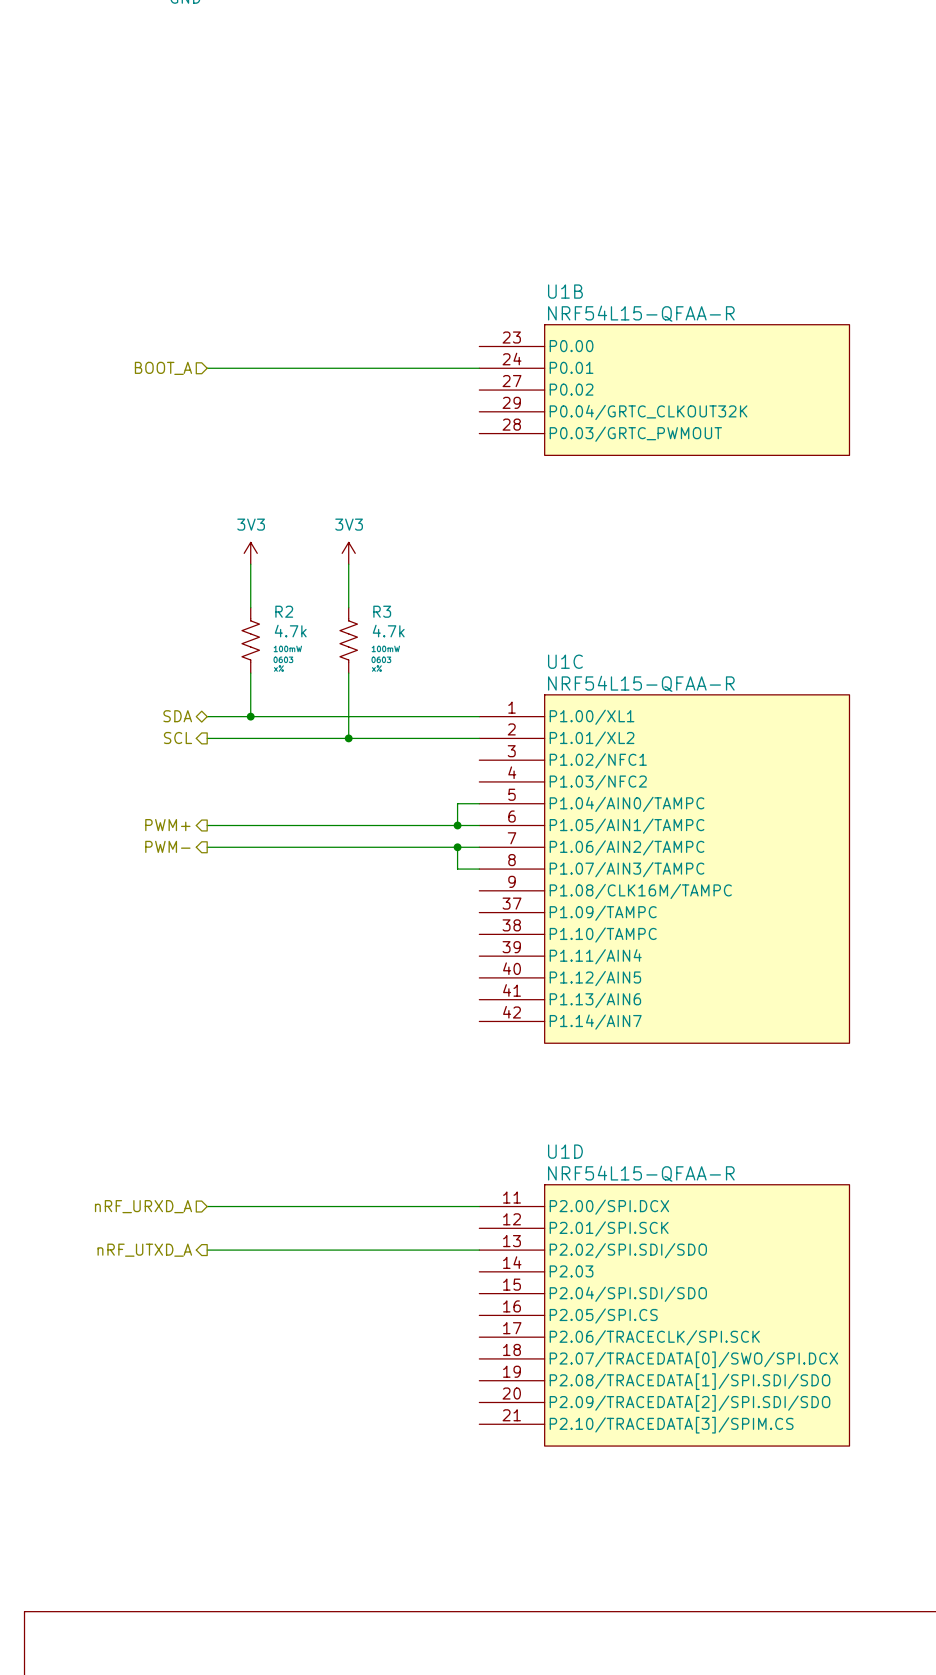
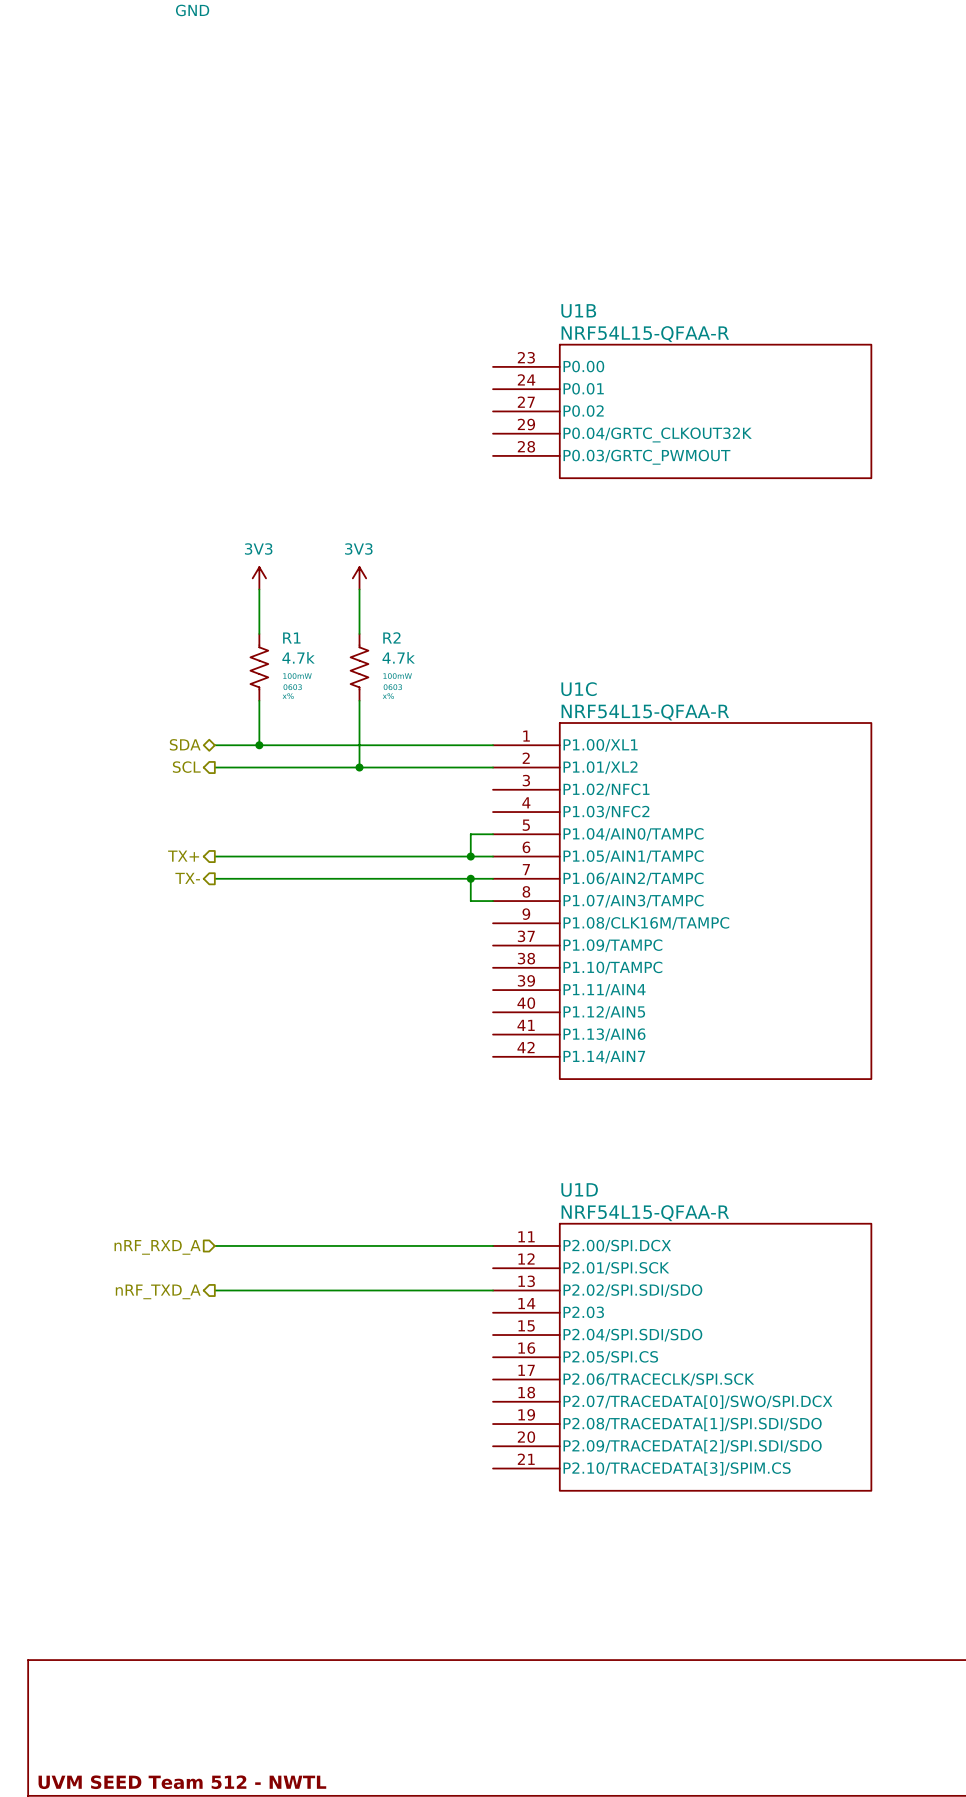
U1B symbol: [479, 324, 850, 456] -> [493, 344, 872, 479]
hierarchical label: BOOT_A (163, 368) -> none
wire: (207, 368) (479, 368) -> none
R2 name: R2 (284, 611) -> R1 (291, 638)
R3 name: R3 (382, 611) -> R2 (391, 637)
U1C symbol: [479, 694, 850, 1044] -> [493, 723, 872, 1080]
hierarchical label: PWM+ (167, 825) -> TX+ (183, 856)
hierarchical label: PWM- (167, 846) -> TX- (187, 878)
U1D symbol: [479, 1184, 850, 1447] -> [493, 1223, 872, 1491]
hierarchical label: nRF_URXD_A (143, 1206) -> nRF_RXD_A (157, 1247)
hierarchical label: nRF_UTXD_A (144, 1250) -> nRF_TXD_A (158, 1291)

